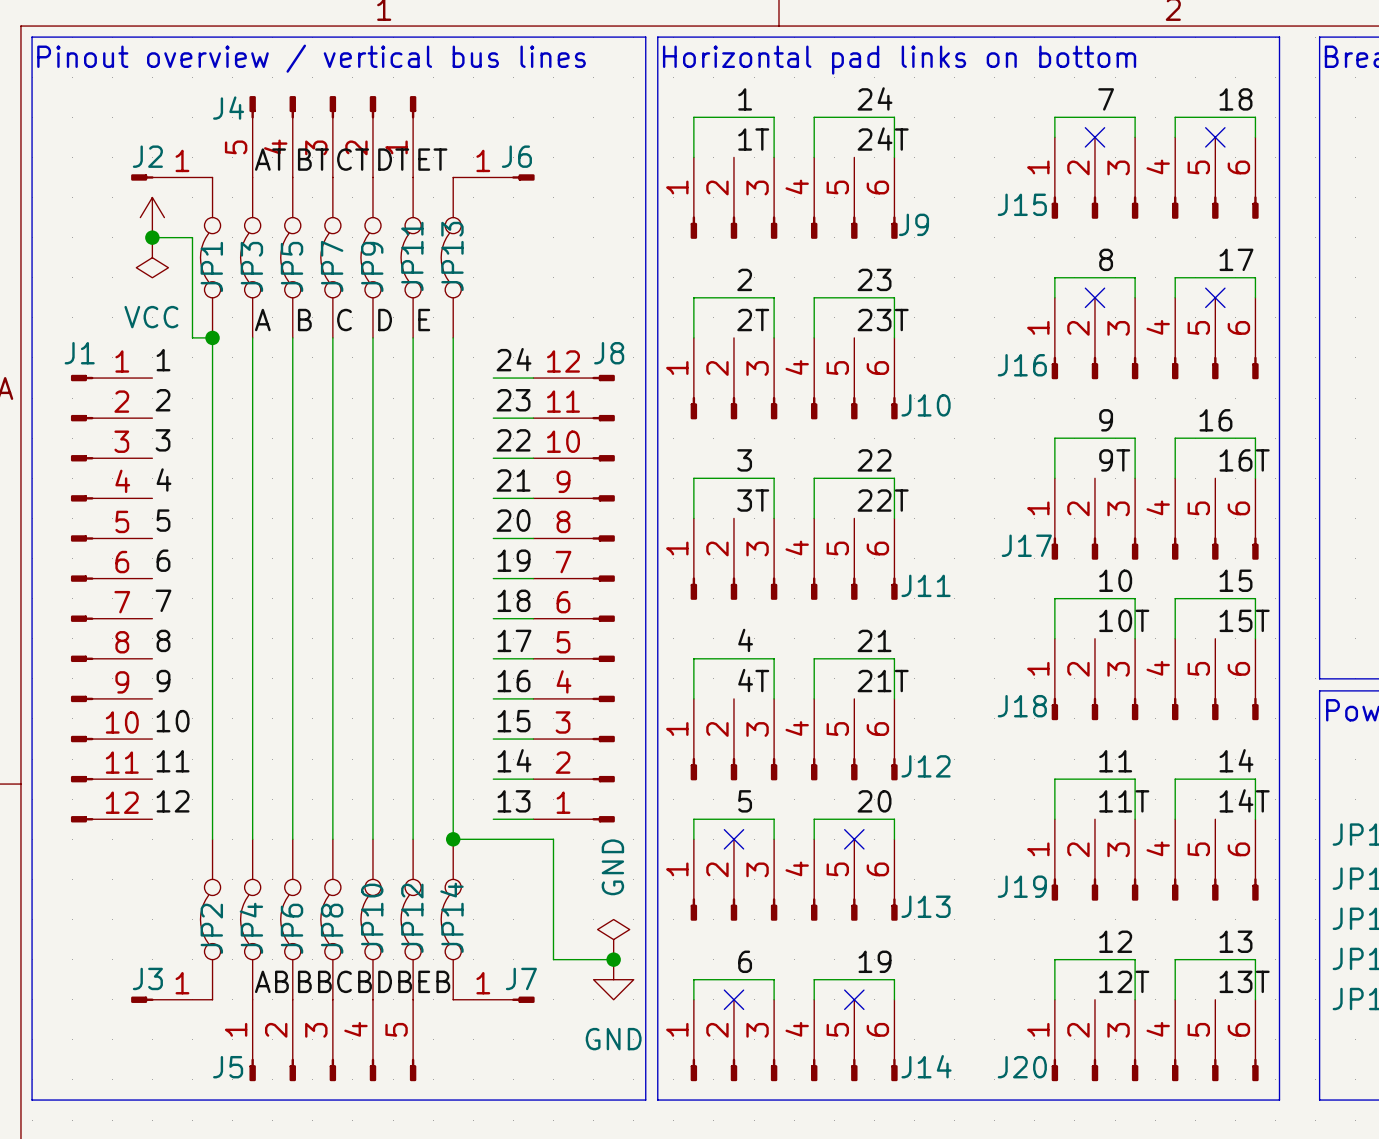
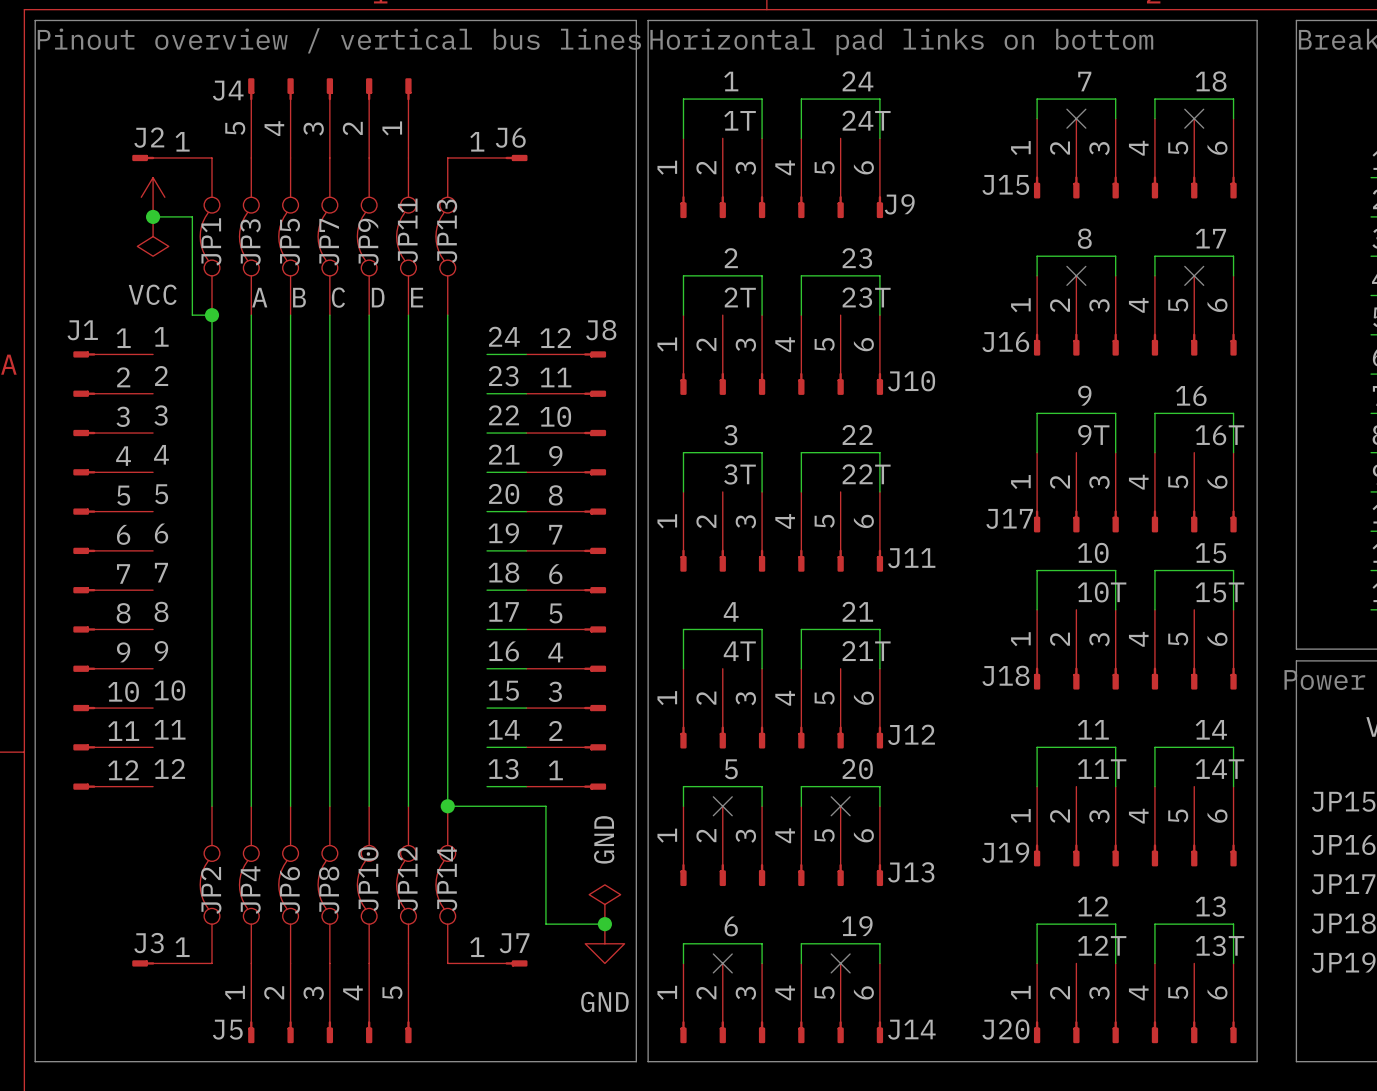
label: AT (270, 159) -> none
label: BT (313, 159) -> none
label: CT (353, 159) -> none
label: DT (393, 159) -> none
label: ET (432, 159) -> none
label: AB (271, 981) -> none
label: BB (314, 981) -> none
label: CB (354, 981) -> none
label: DB (395, 981) -> none
label: EB (434, 981) -> none

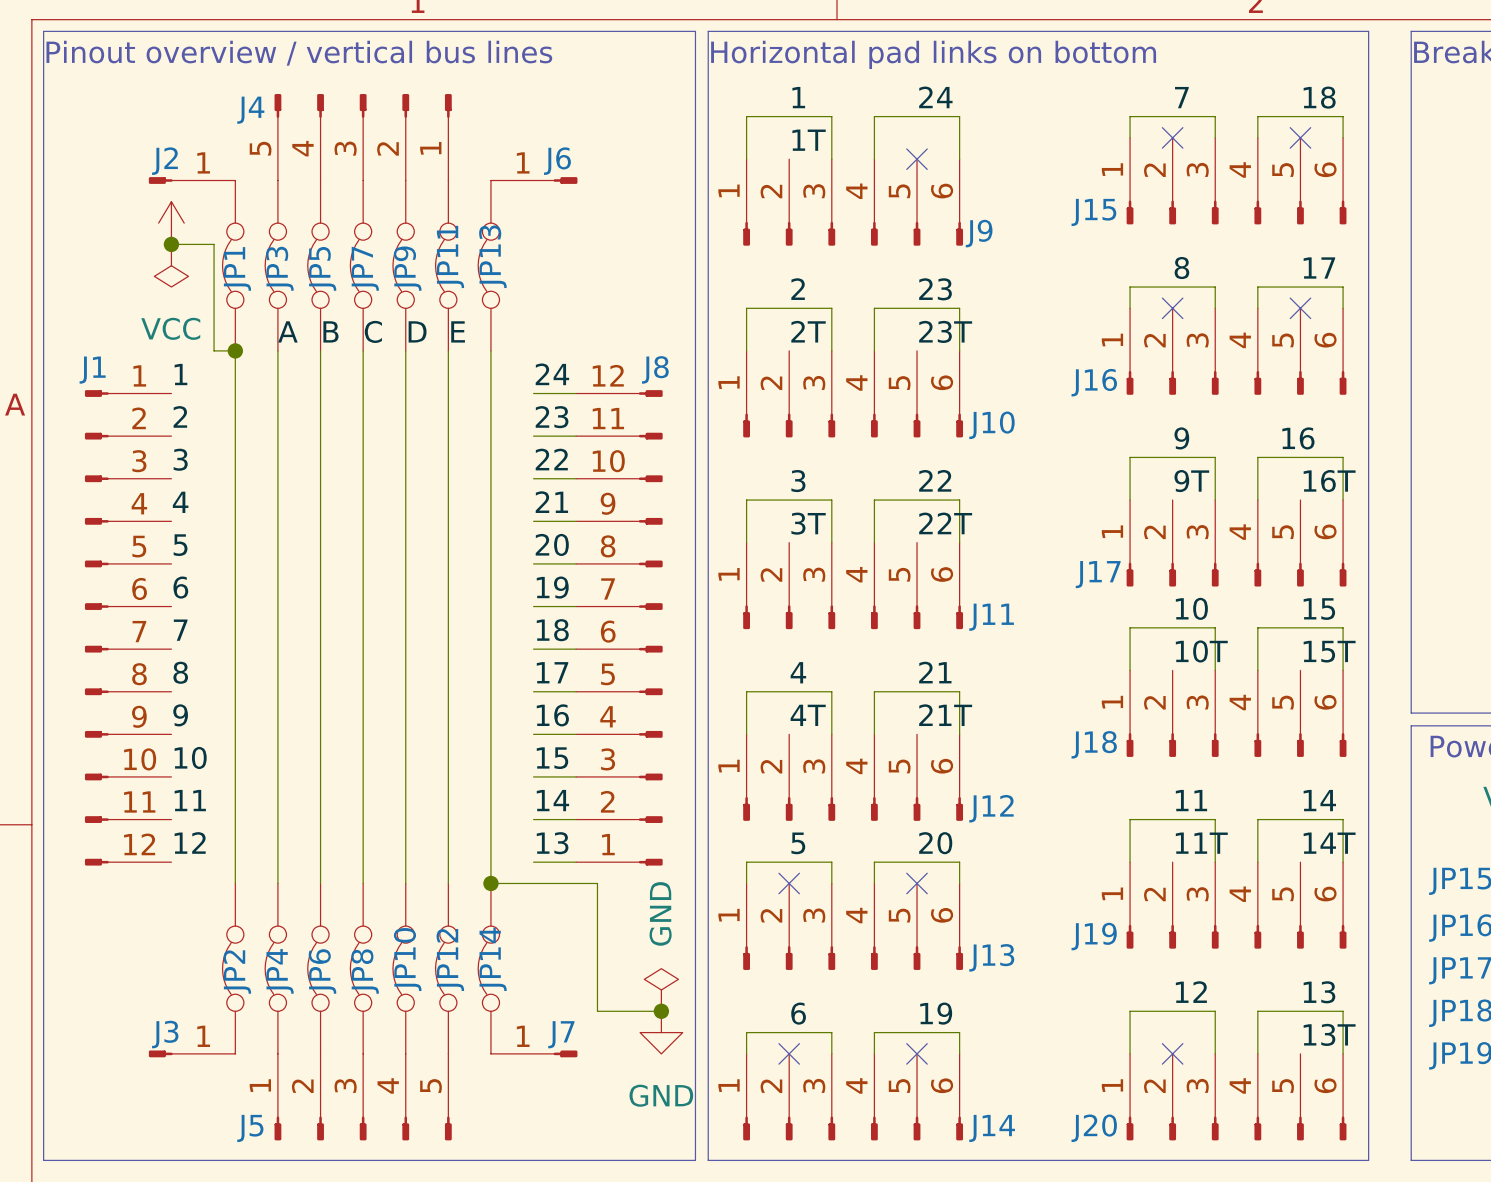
label: 24T (866, 120) -> none
no-connect mark: none -> (917, 159)
label: 12T (1102, 945) -> none
no-connect mark: none -> (1172, 1053)

